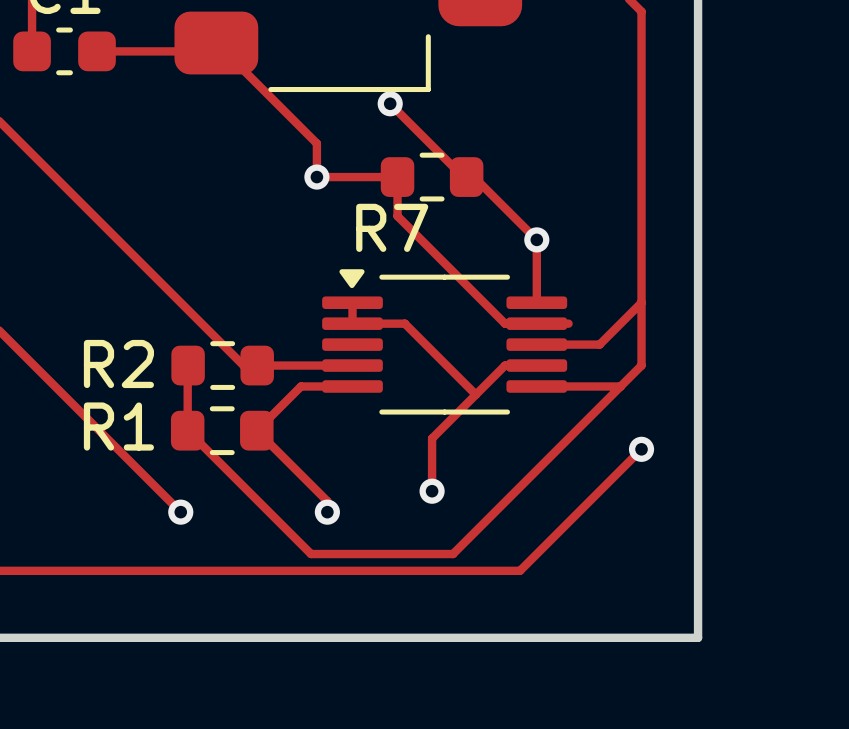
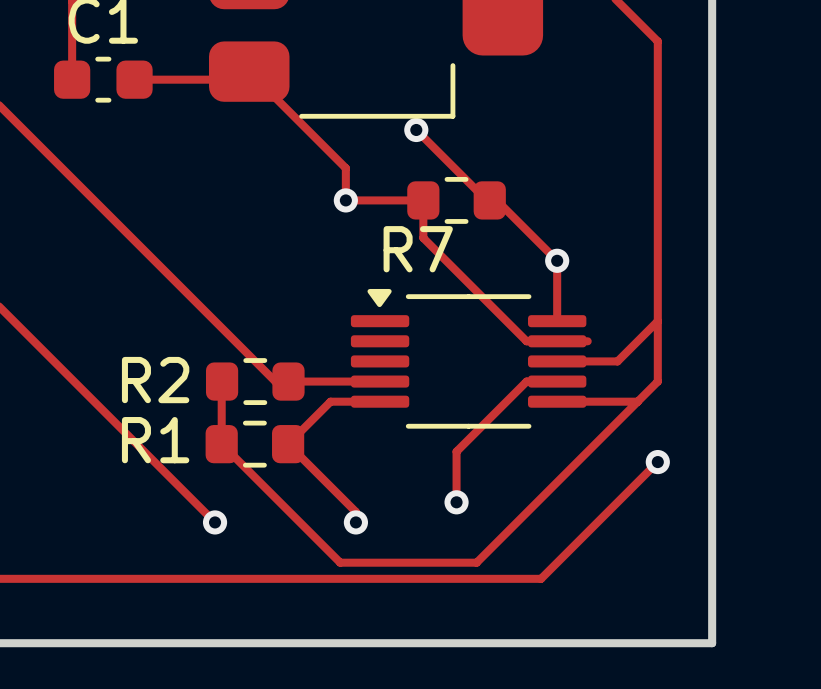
track: (352, 302) (352, 323) (404, 323) (475, 394) -> none

